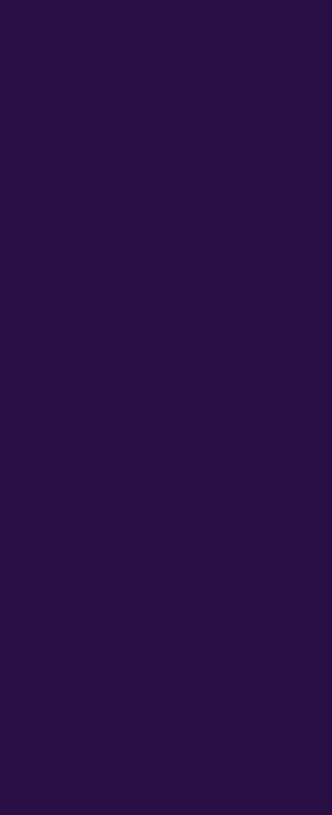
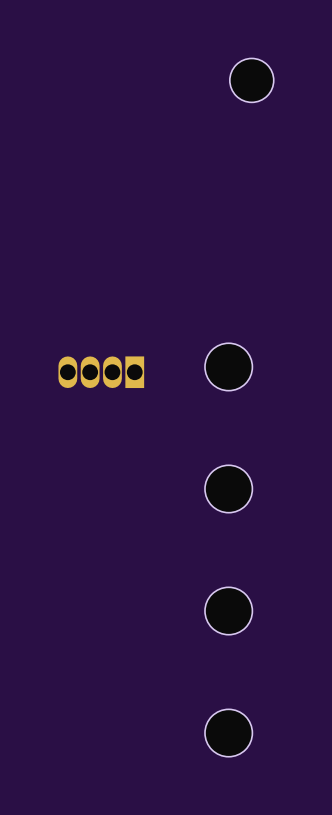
part: none -> (251, 80)
part: none -> (228, 366)
part: none -> (101, 372)
part: none -> (228, 488)
part: none -> (228, 611)
part: none -> (228, 733)

